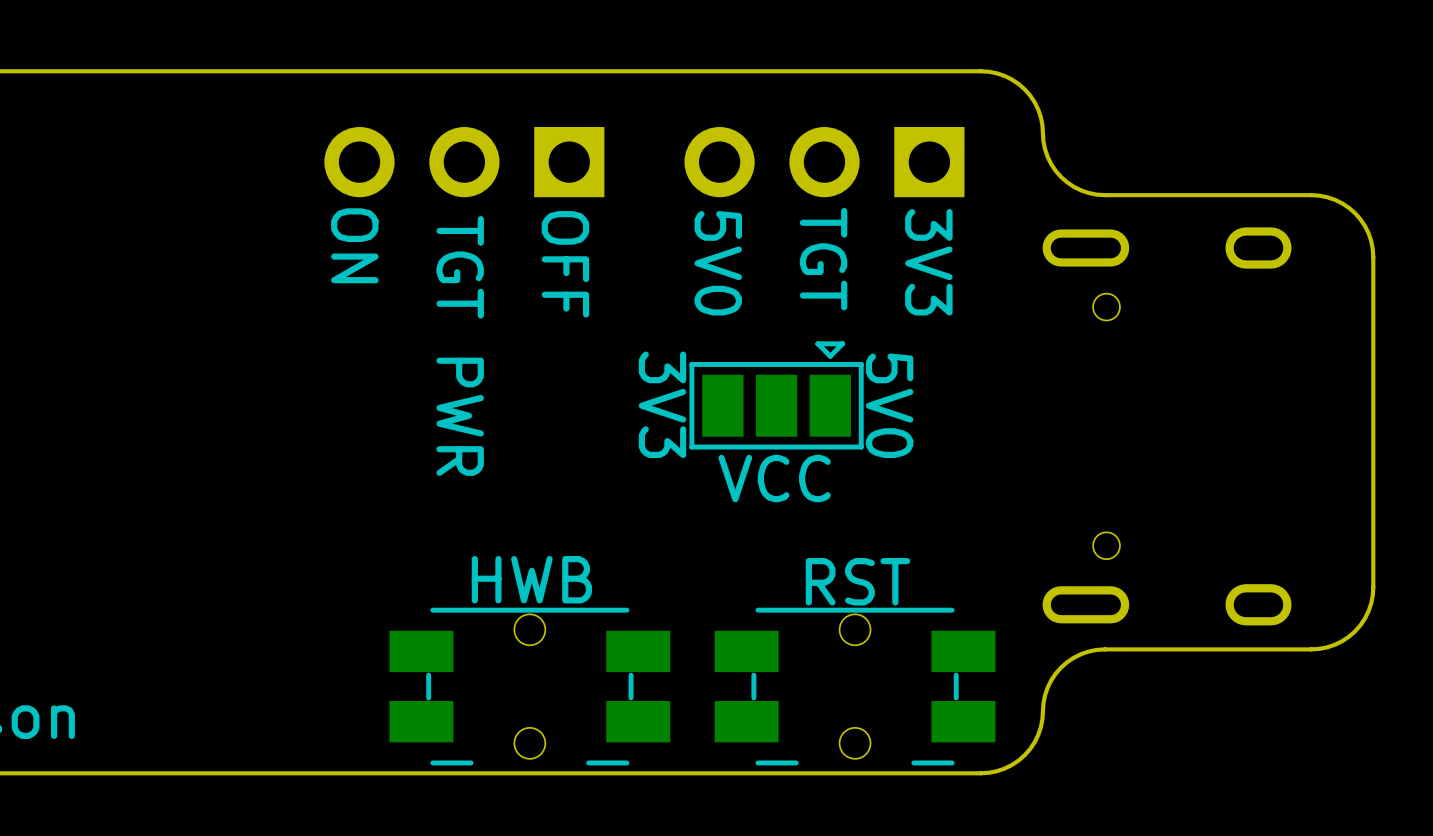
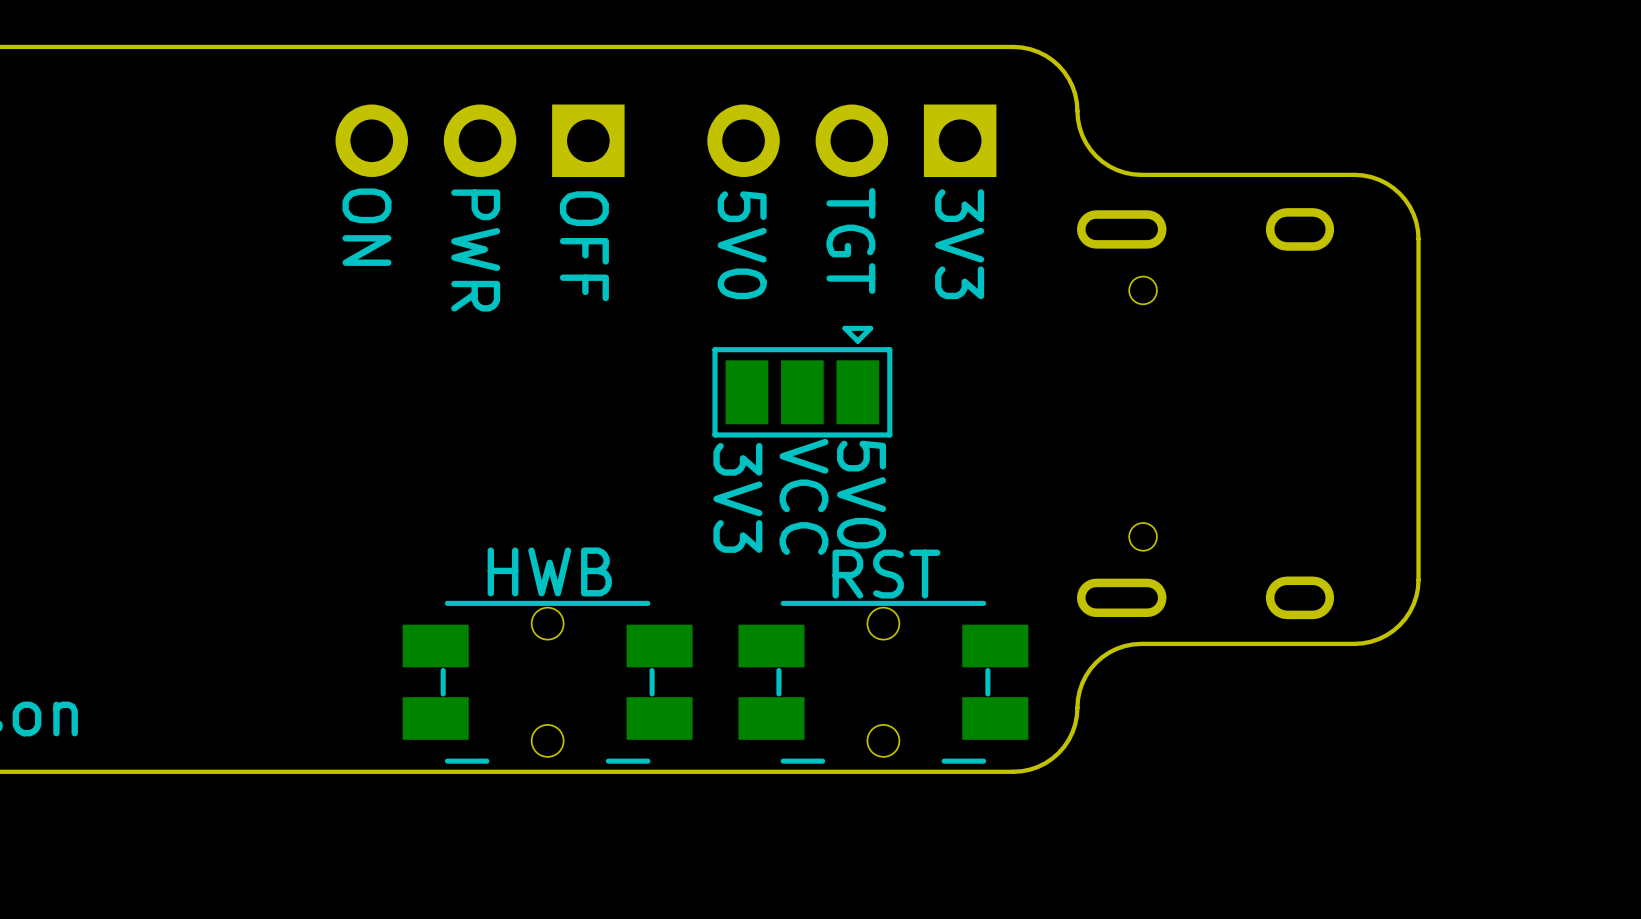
text: none -> PWR (475, 250)
text: TGT PWR (460, 345) -> none
text position: 3V3 (662, 404) -> 3V3 (737, 497)
text position: 5V0 (889, 405) -> 5V0 (861, 494)
text rotation: 0° (774, 478) -> 90° clockwise (803, 496)

